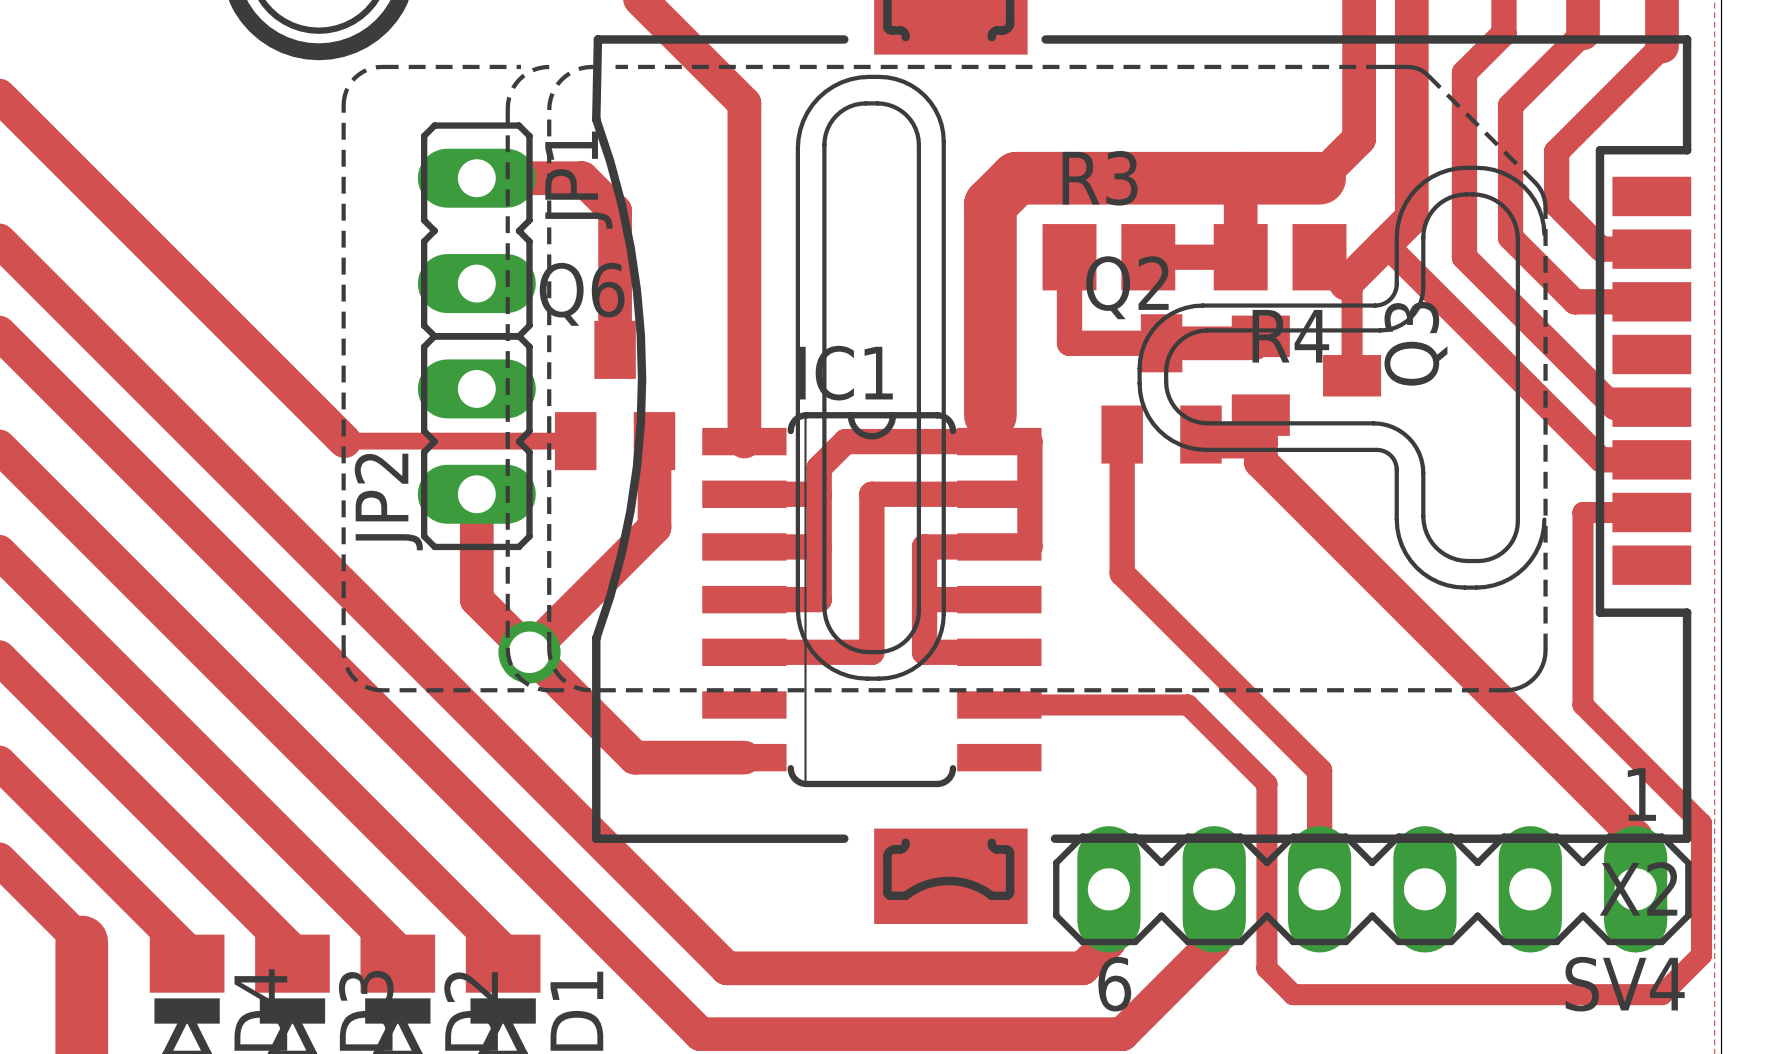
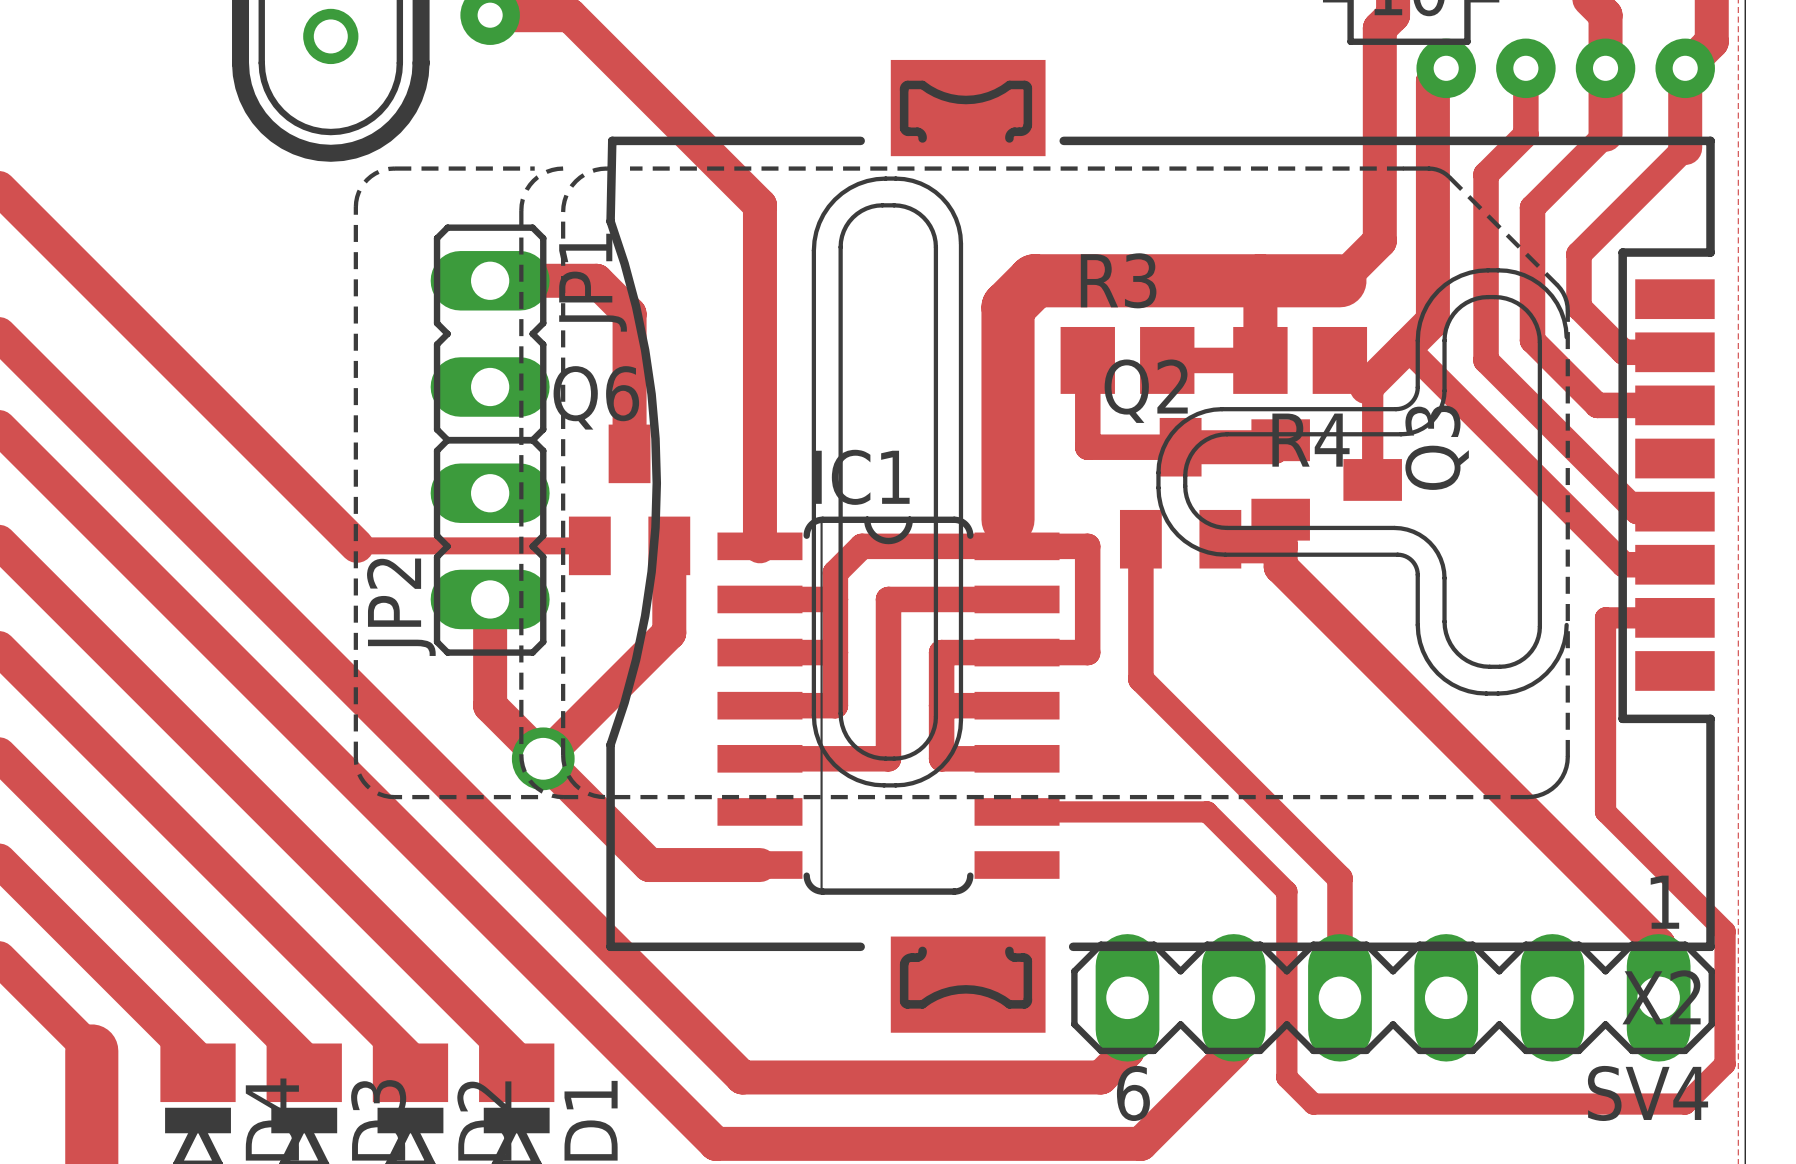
track: (1029, 441) (1029, 546) -> (1047, 546) (1087, 546) (1087, 652) (1047, 652)

